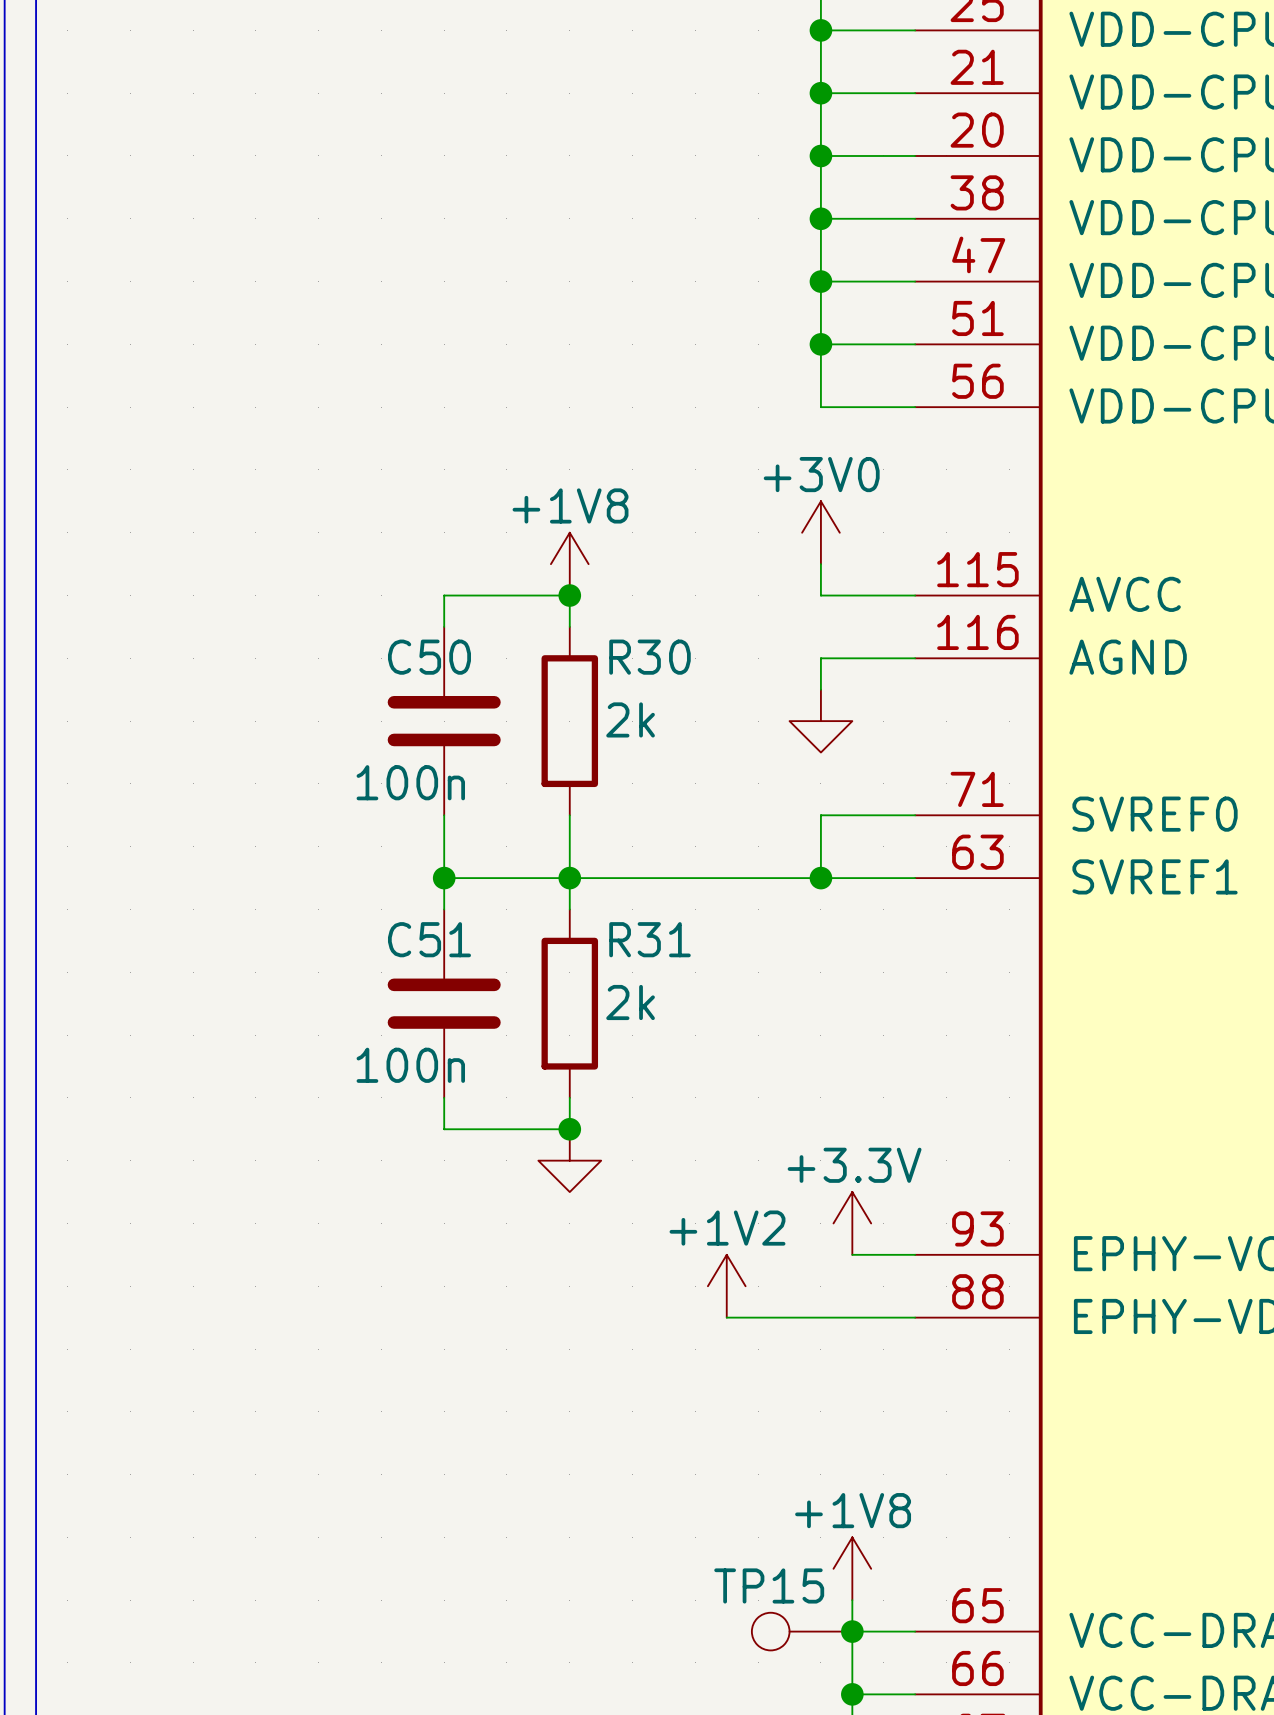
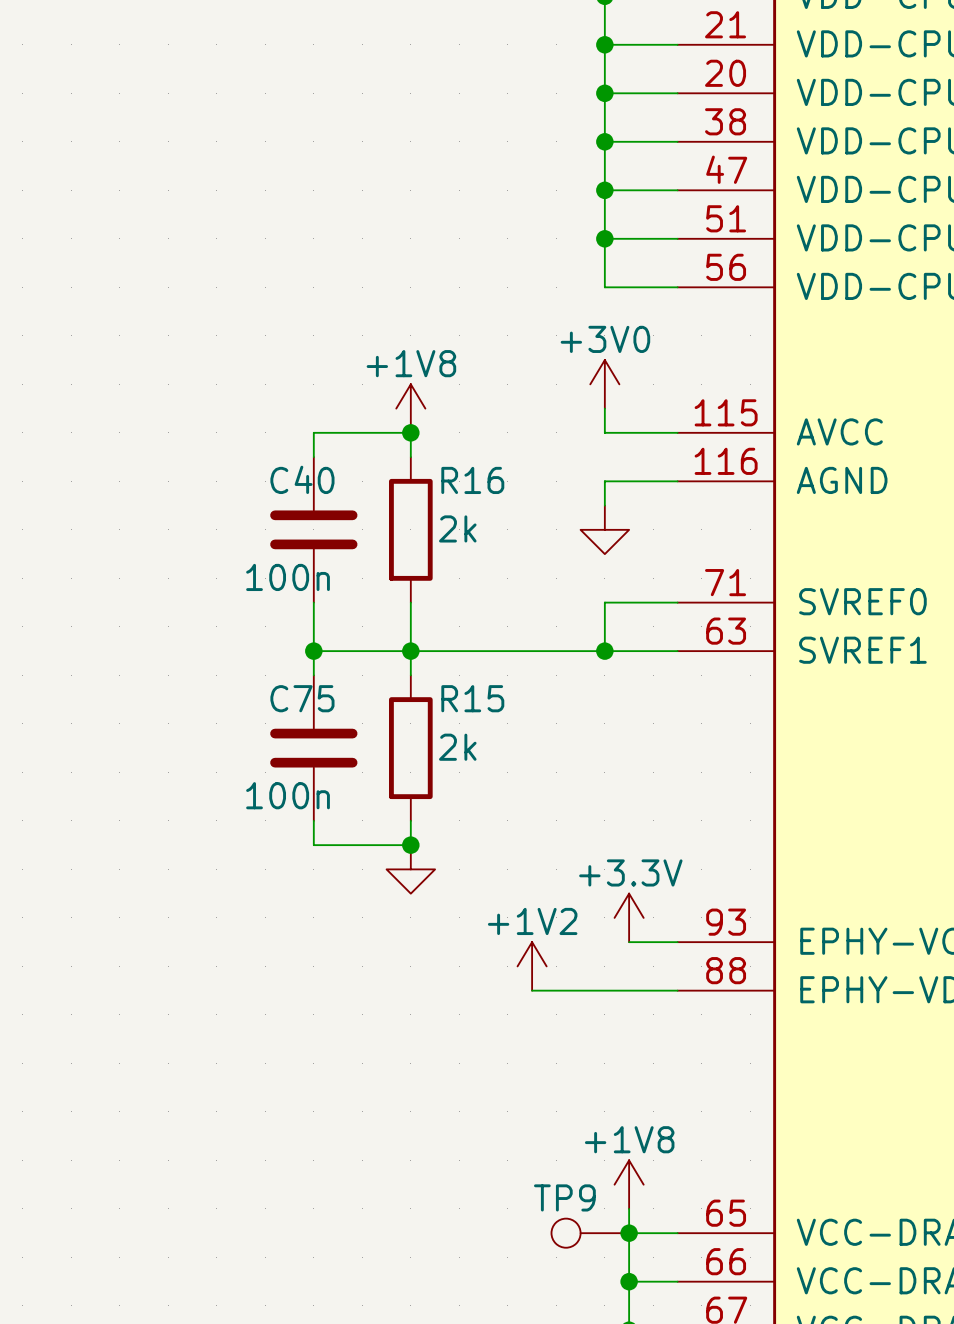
C50 name: C50 (429, 657) -> C40 (302, 479)
R30 name: R30 (650, 657) -> R16 (472, 480)
C51 name: C51 (429, 939) -> C75 (302, 698)
R31 name: R31 (650, 939) -> R15 (472, 698)
TP15 name: TP15 (769, 1585) -> TP9 (564, 1197)

